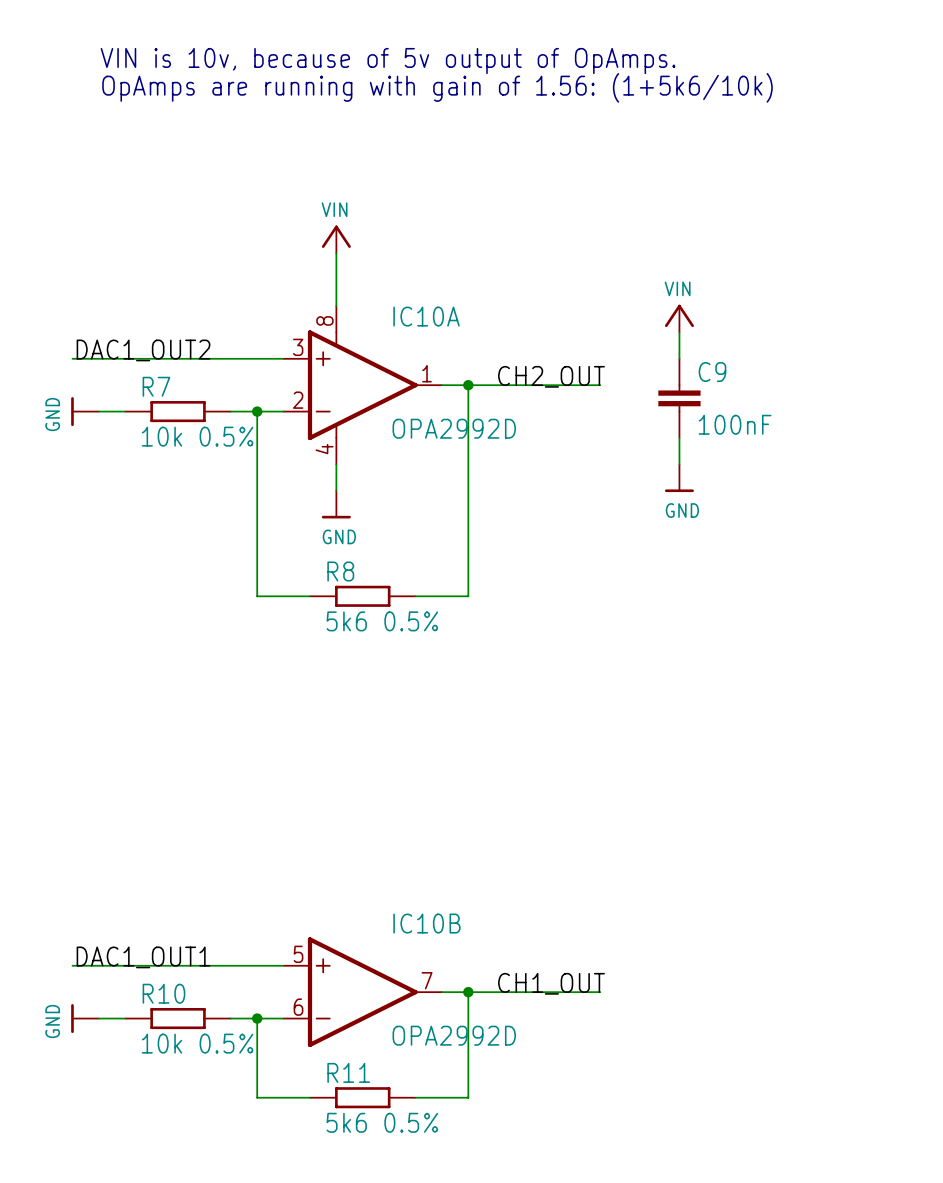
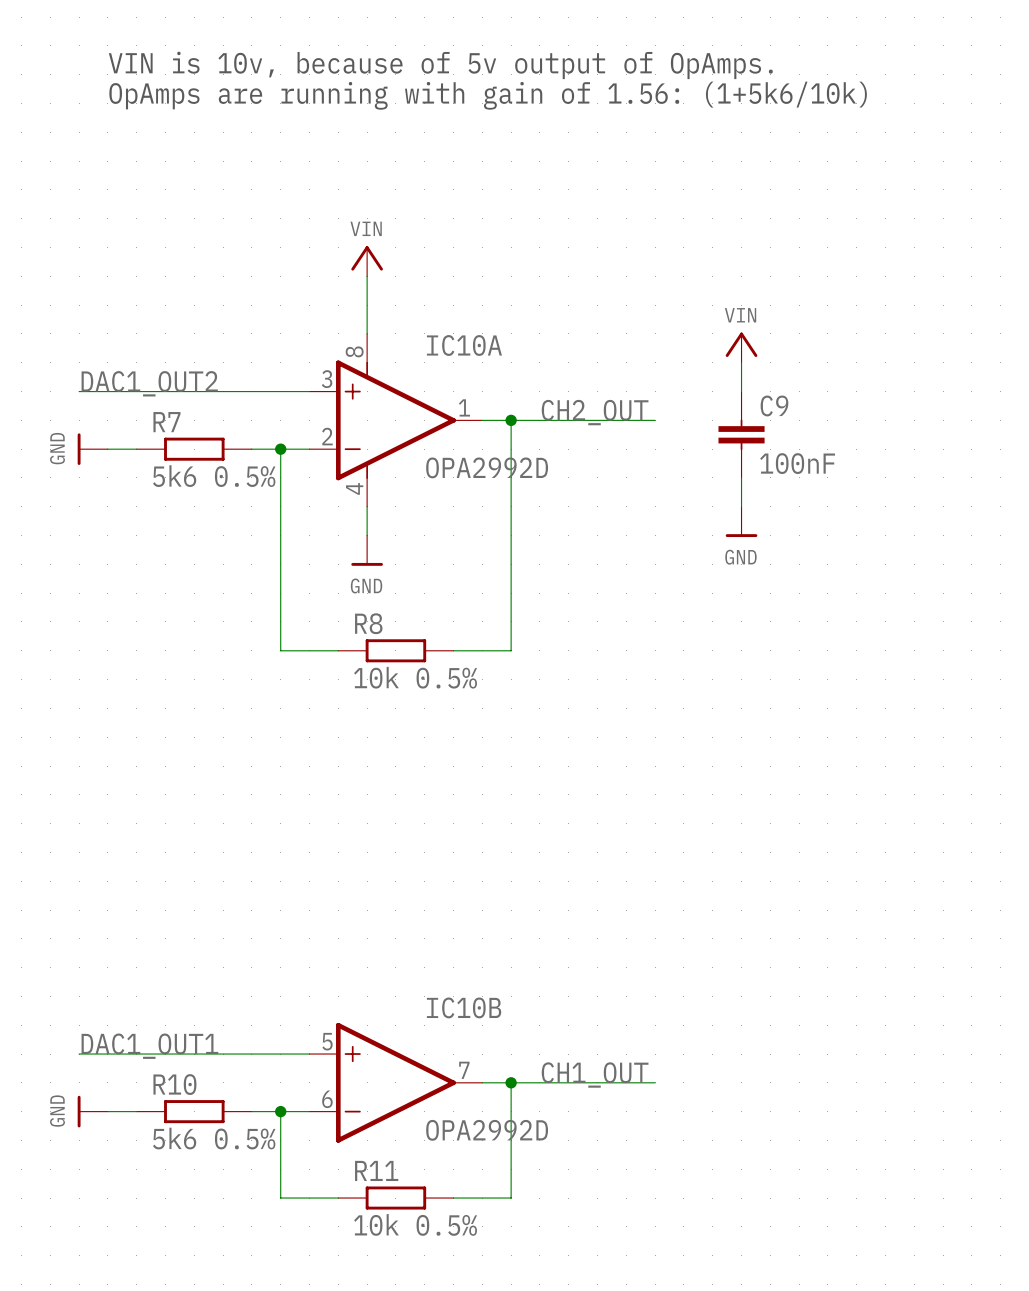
R7 value: 10k 0.5% (197, 436) -> 5k6 0.5% (214, 476)
R8 value: 5k6 0.5% (382, 621) -> 10k 0.5% (415, 677)
R10 value: 10k 0.5% (197, 1043) -> 5k6 0.5% (214, 1138)
R11 value: 5k6 0.5% (382, 1122) -> 10k 0.5% (415, 1224)

